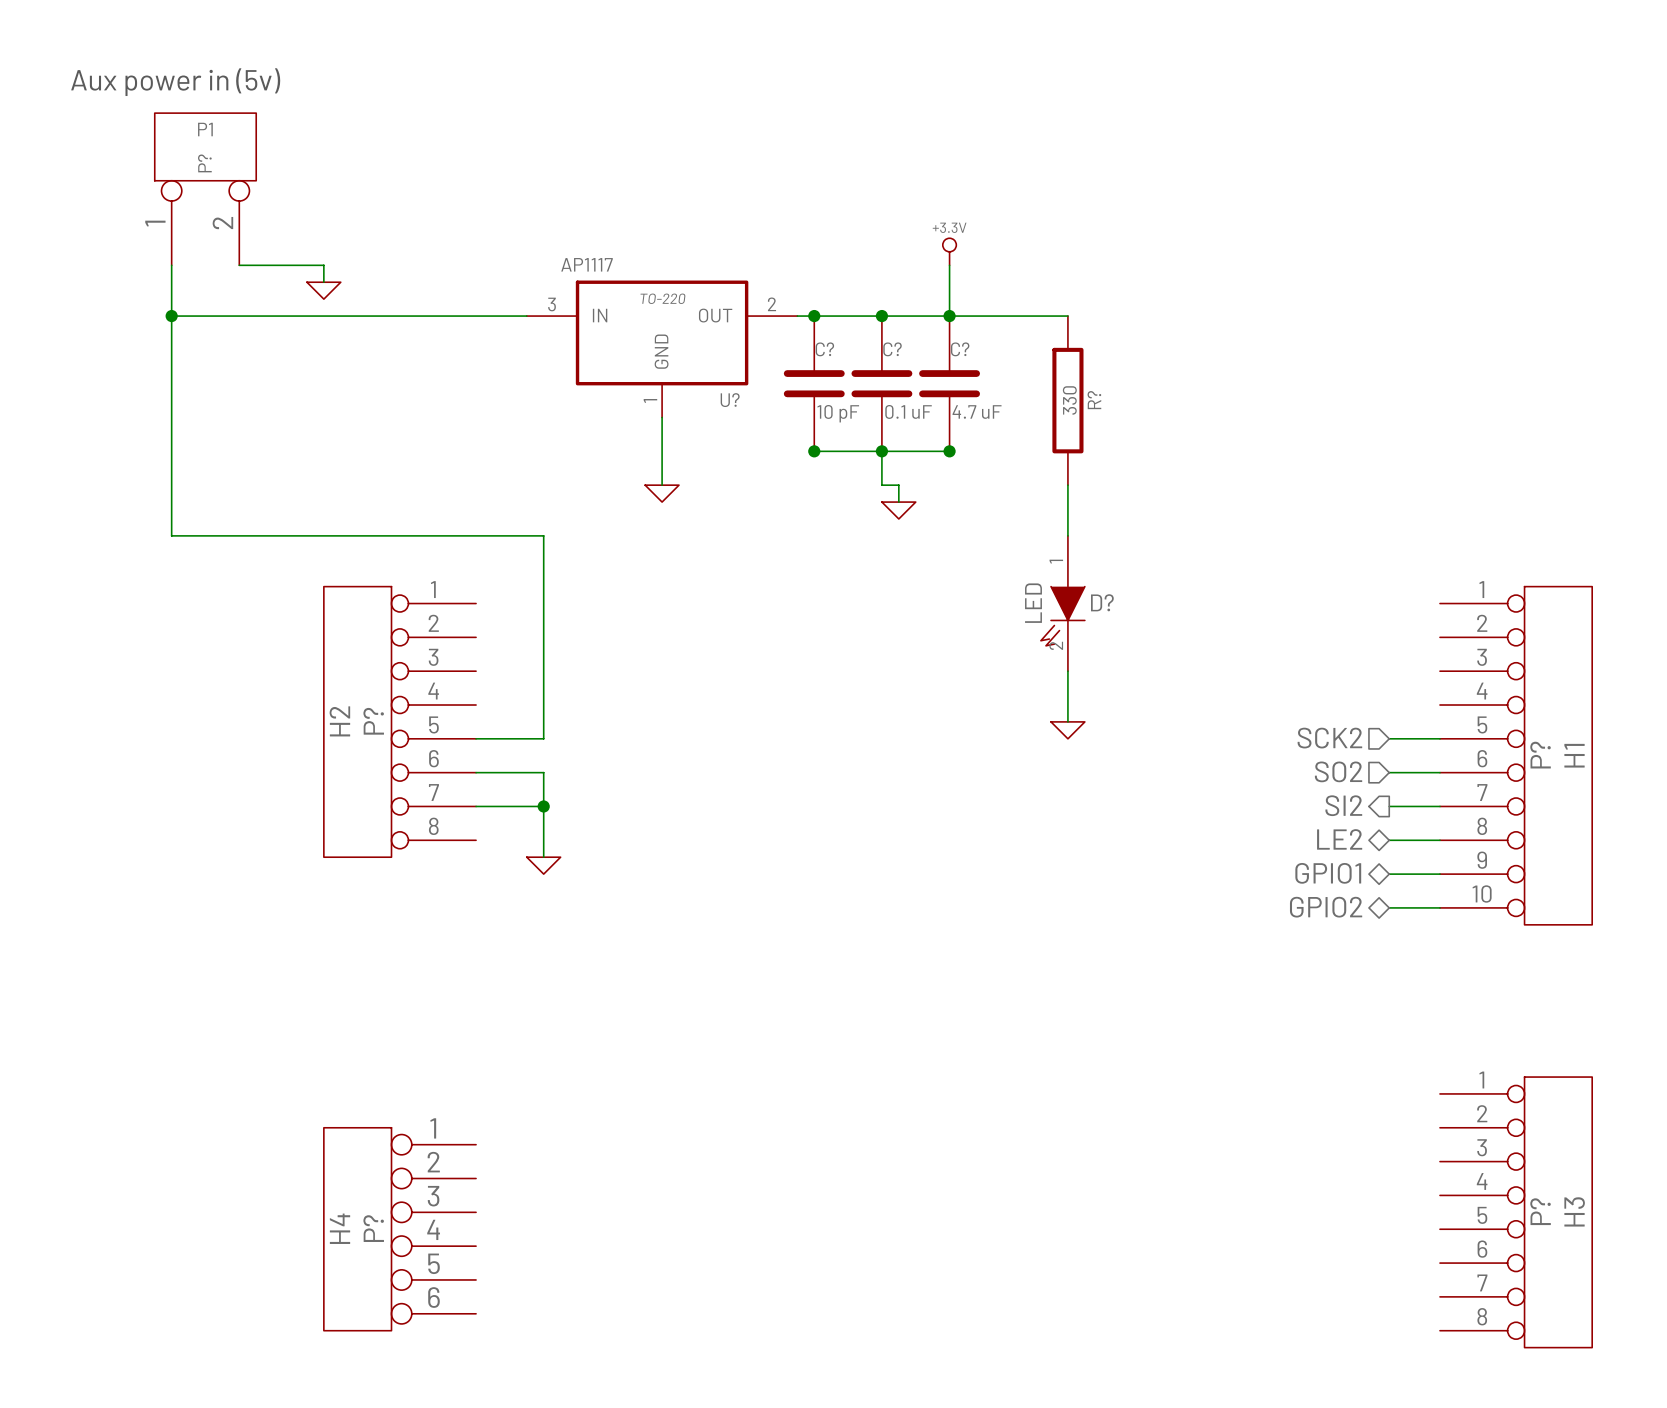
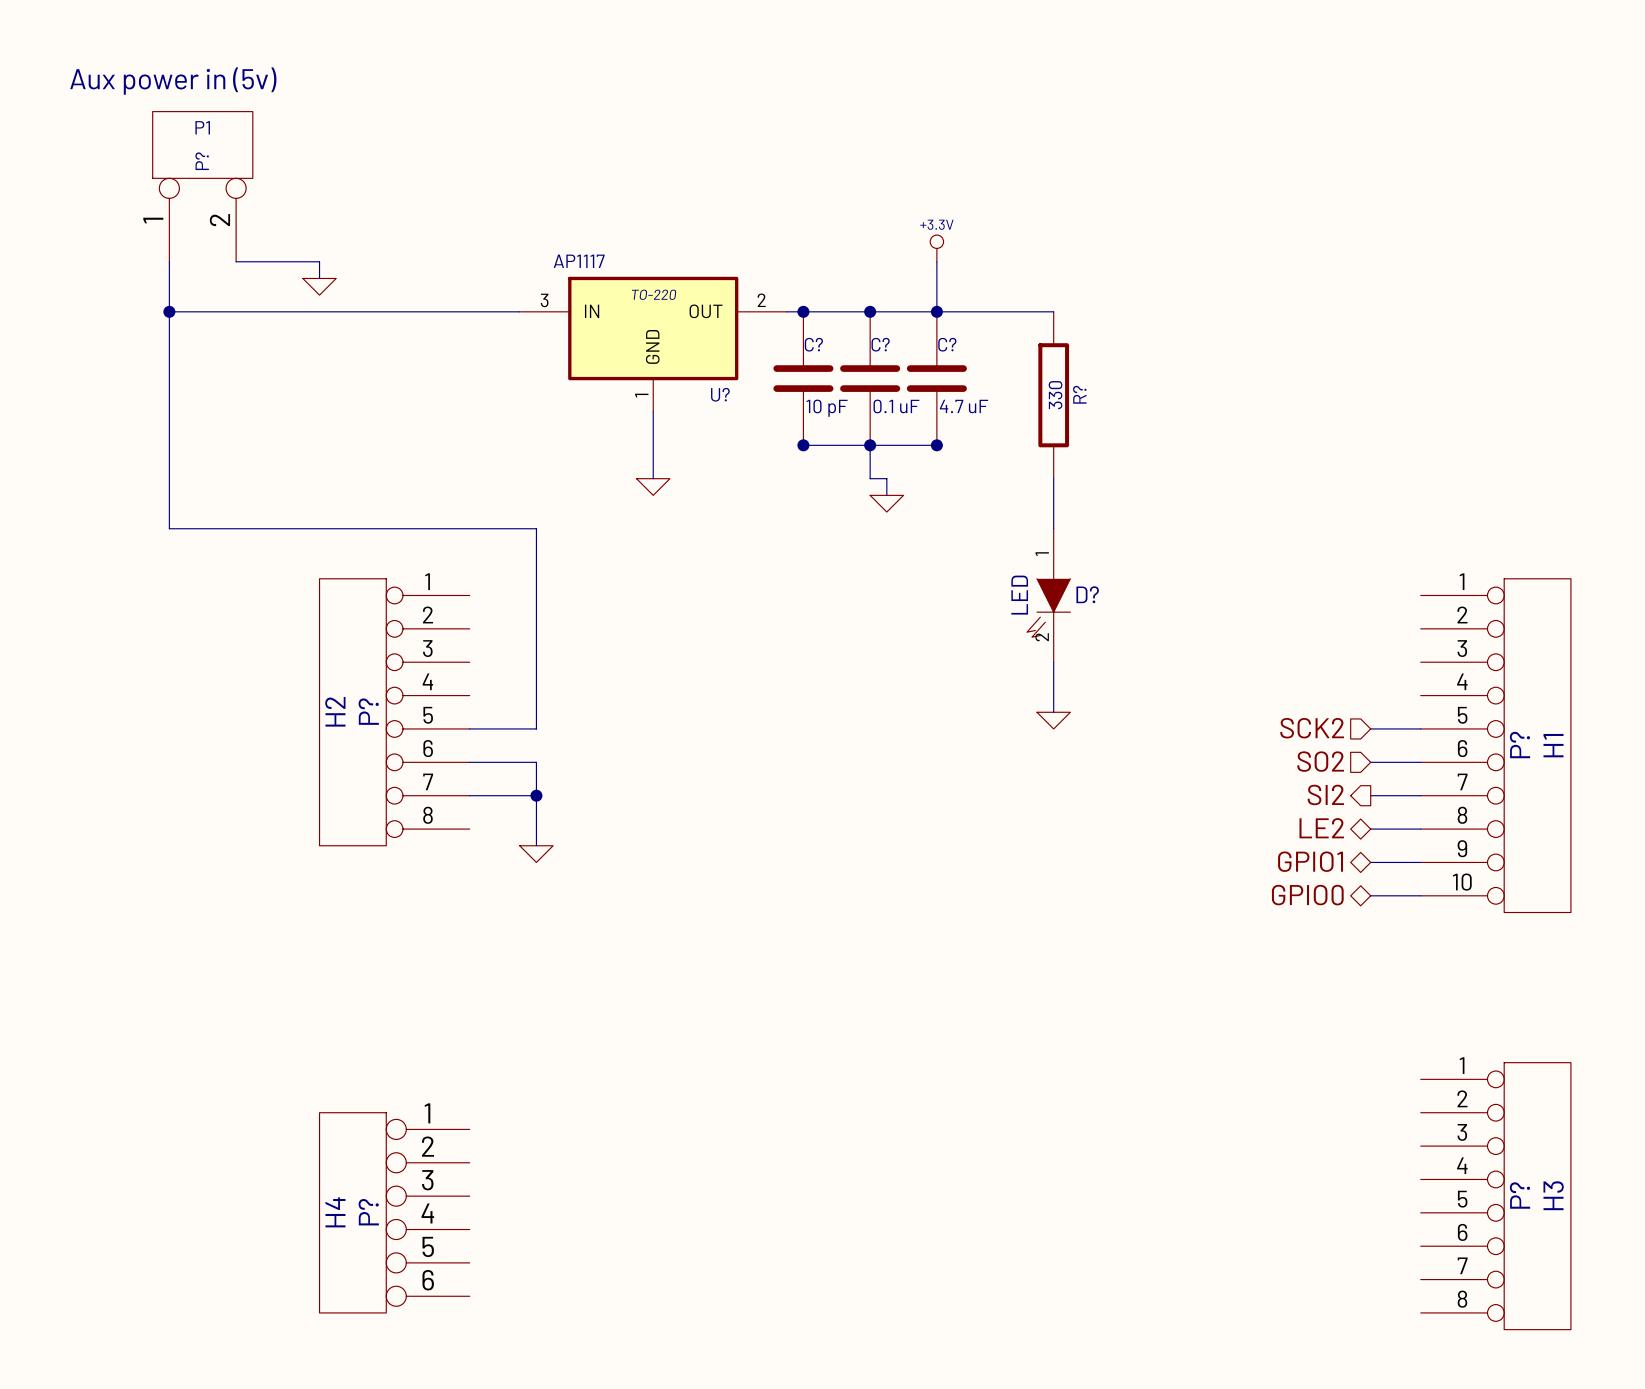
hierarchical label: GPIO2 (1326, 907) -> GPIO0 (1307, 895)

